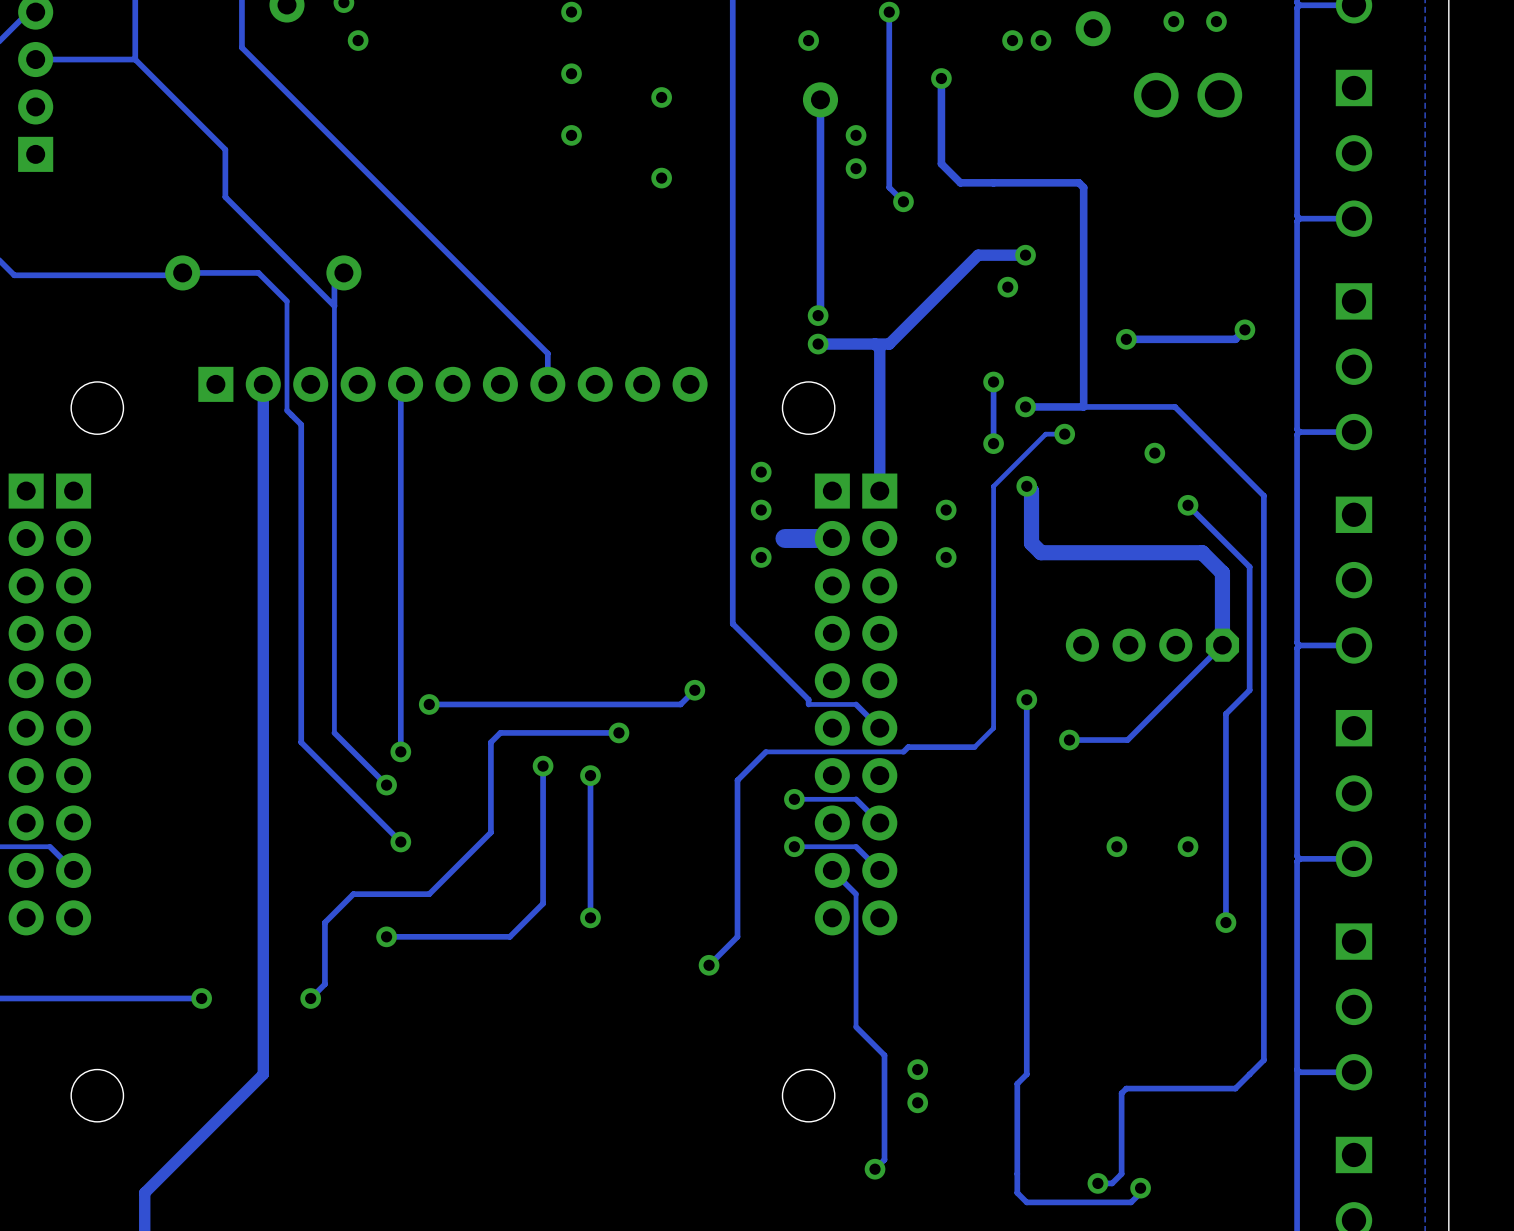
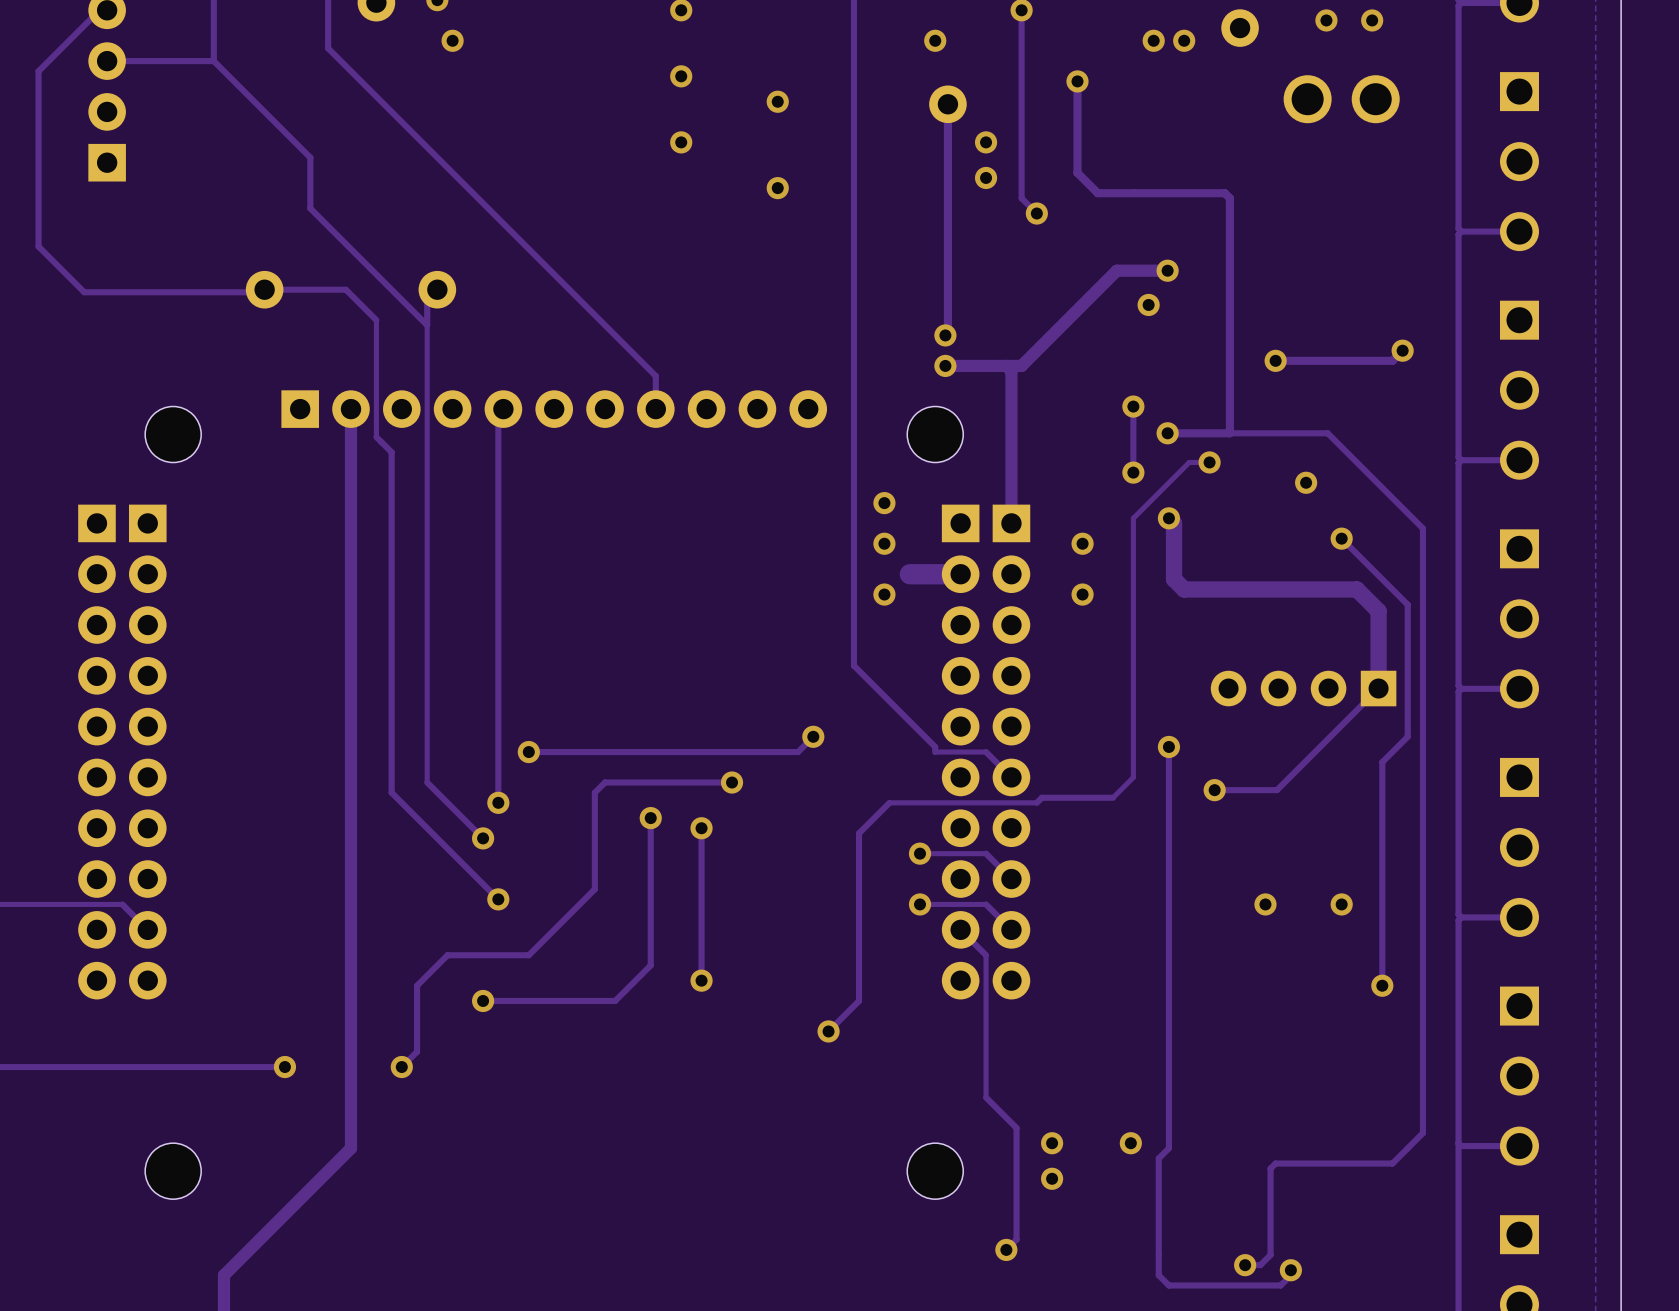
part footprint: [1065, 628, 1240, 662] -> [1210, 670, 1397, 707]
via: none -> (1130, 1143)

